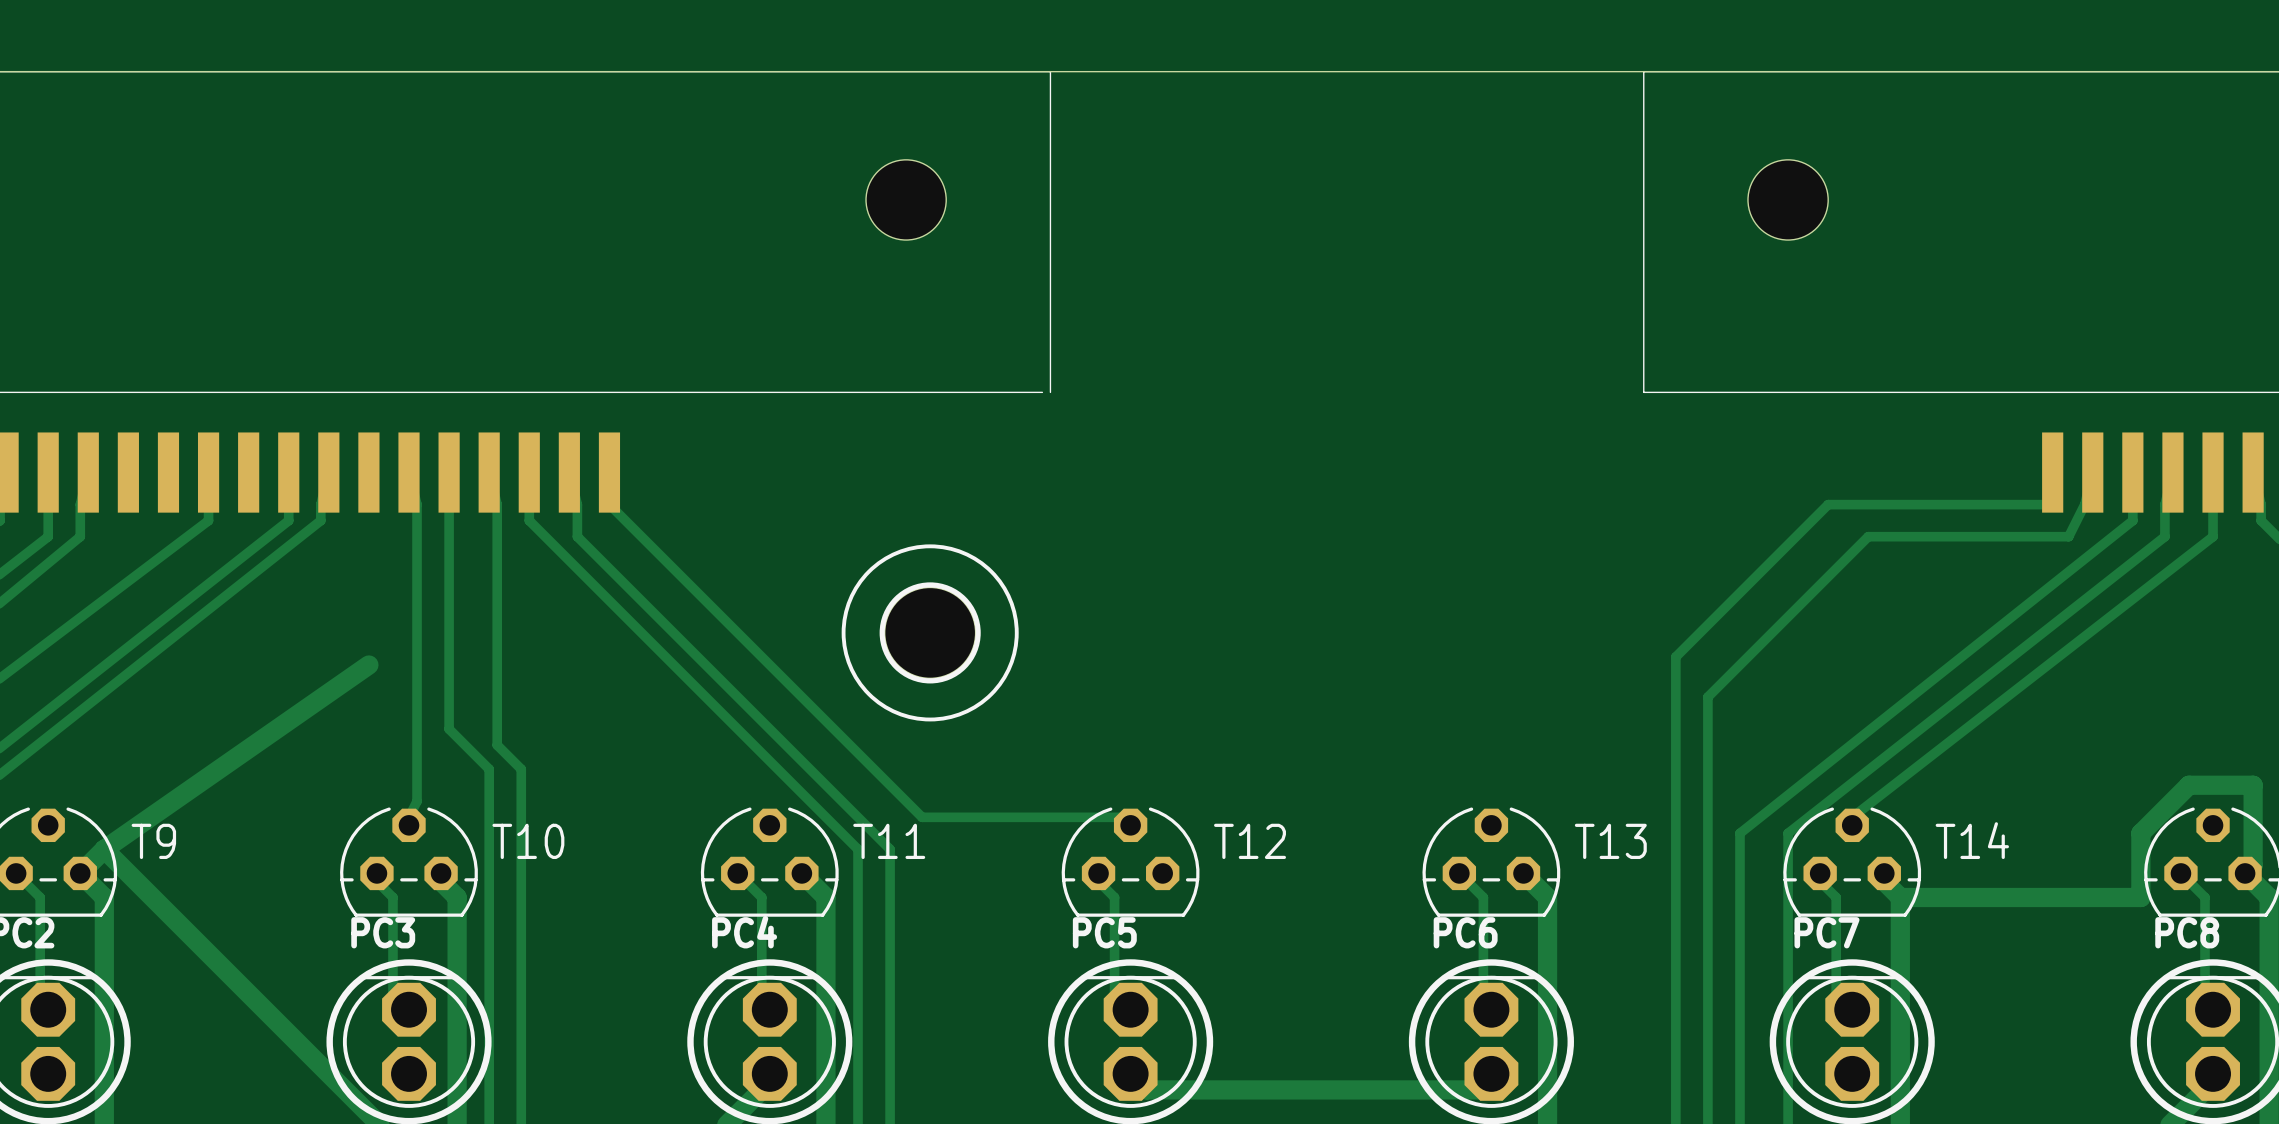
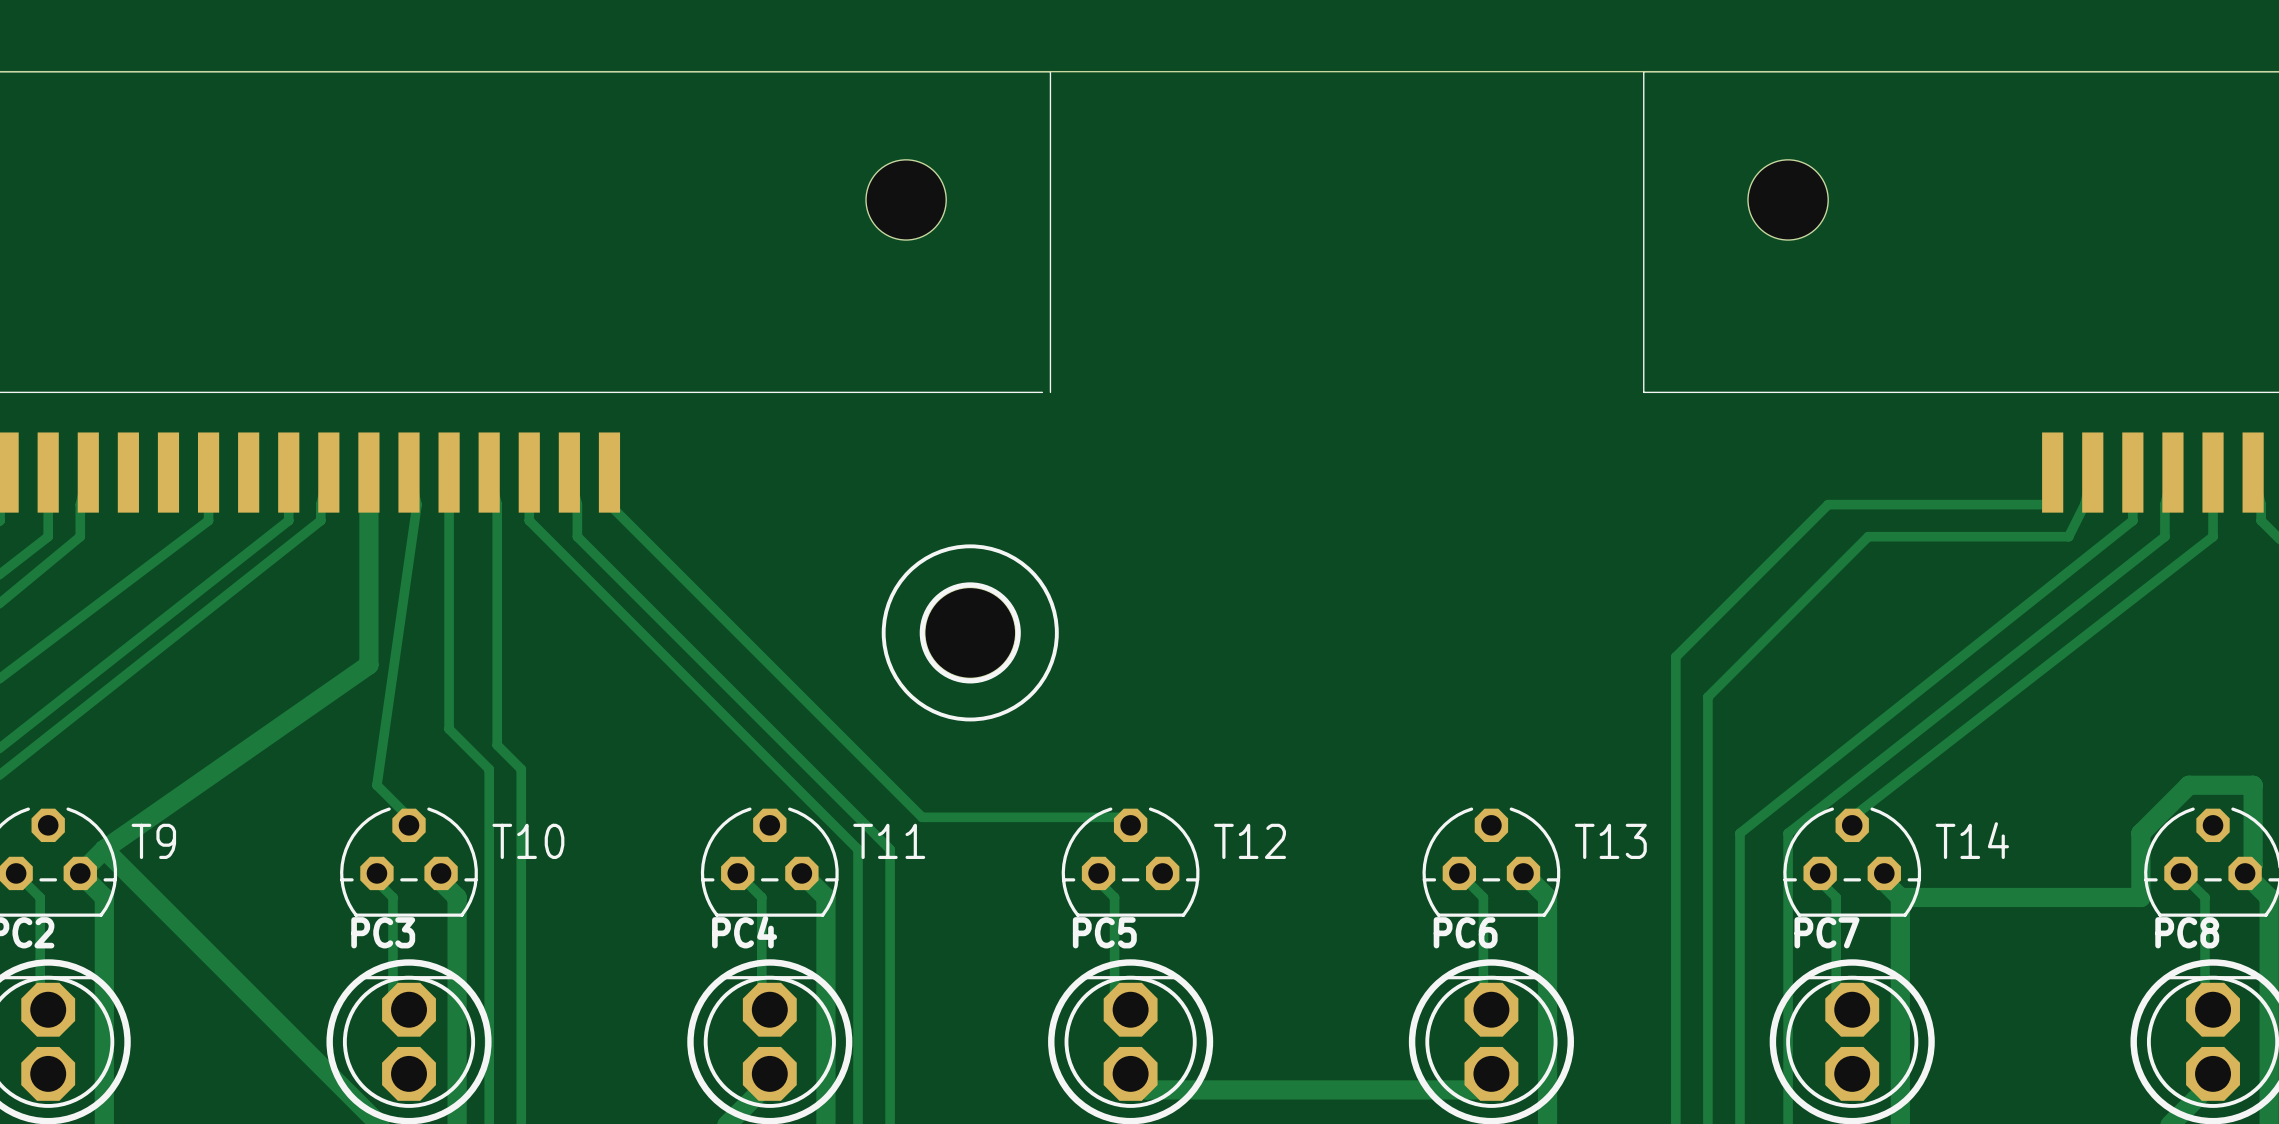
track: none -> (368, 472) (368, 664)
track: (417, 504) (417, 801) (409, 817) -> (417, 504) (376, 785) (409, 817)
part position: (930, 632) -> (970, 632)

